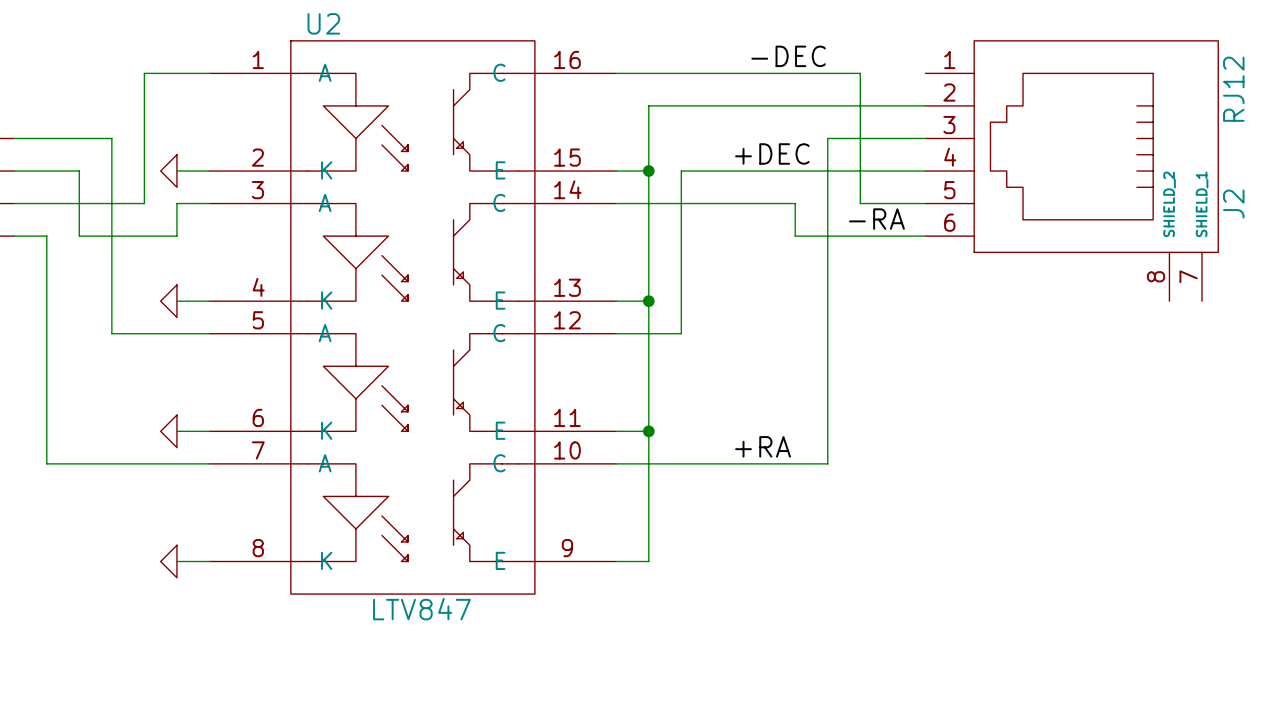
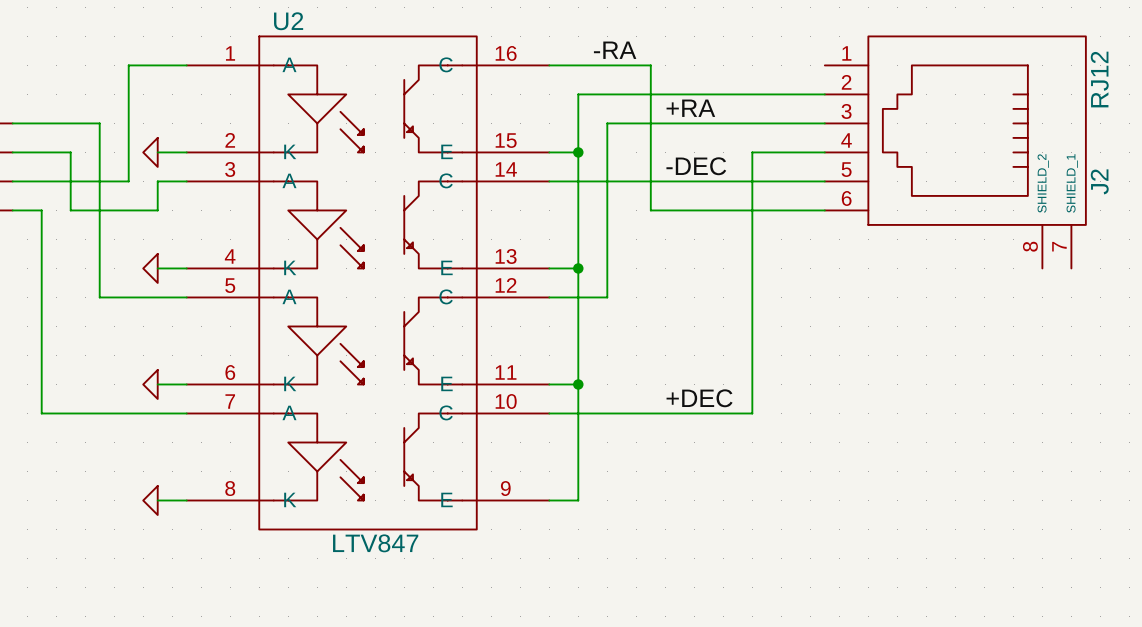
label position: -DEC (788, 56) -> -DEC (696, 166)
wire: (730, 73) (860, 73) (860, 203) -> (650, 65) (650, 210) (708, 210)
label: none -> +RA (690, 108)
wire: (827, 138) (827, 463) -> (752, 152) (752, 413) (737, 413)
label position: +DEC (772, 153) -> +DEC (699, 398)
wire: (681, 171) (844, 171) -> (607, 152) (607, 123) (737, 123)
wire: (795, 203) (795, 236) -> (708, 181) (766, 181)
label position: -RA (876, 219) -> -RA (615, 50)
label: +RA (763, 446) -> none

